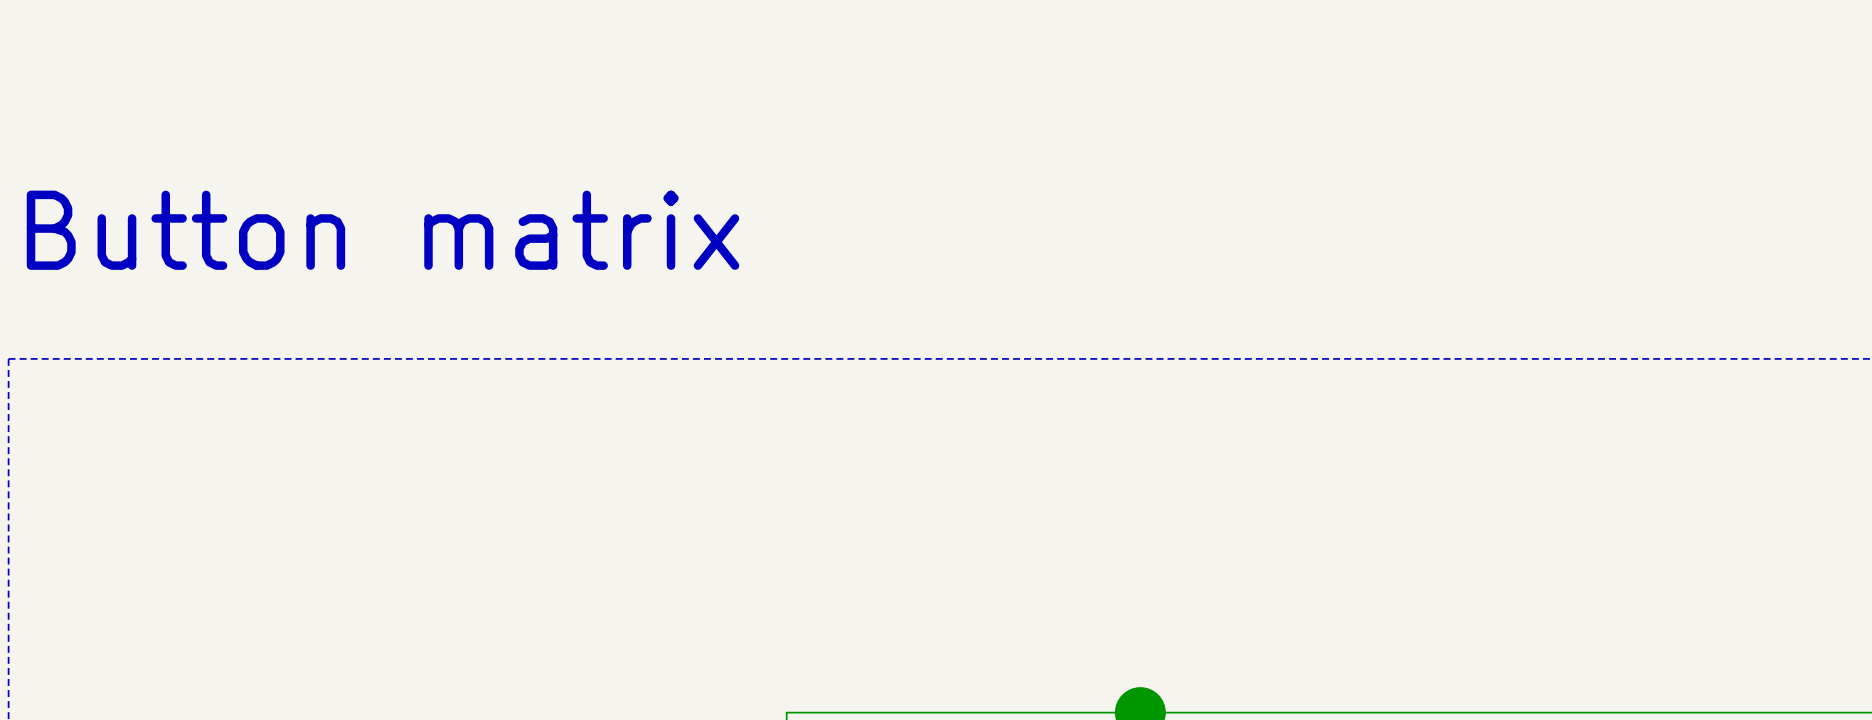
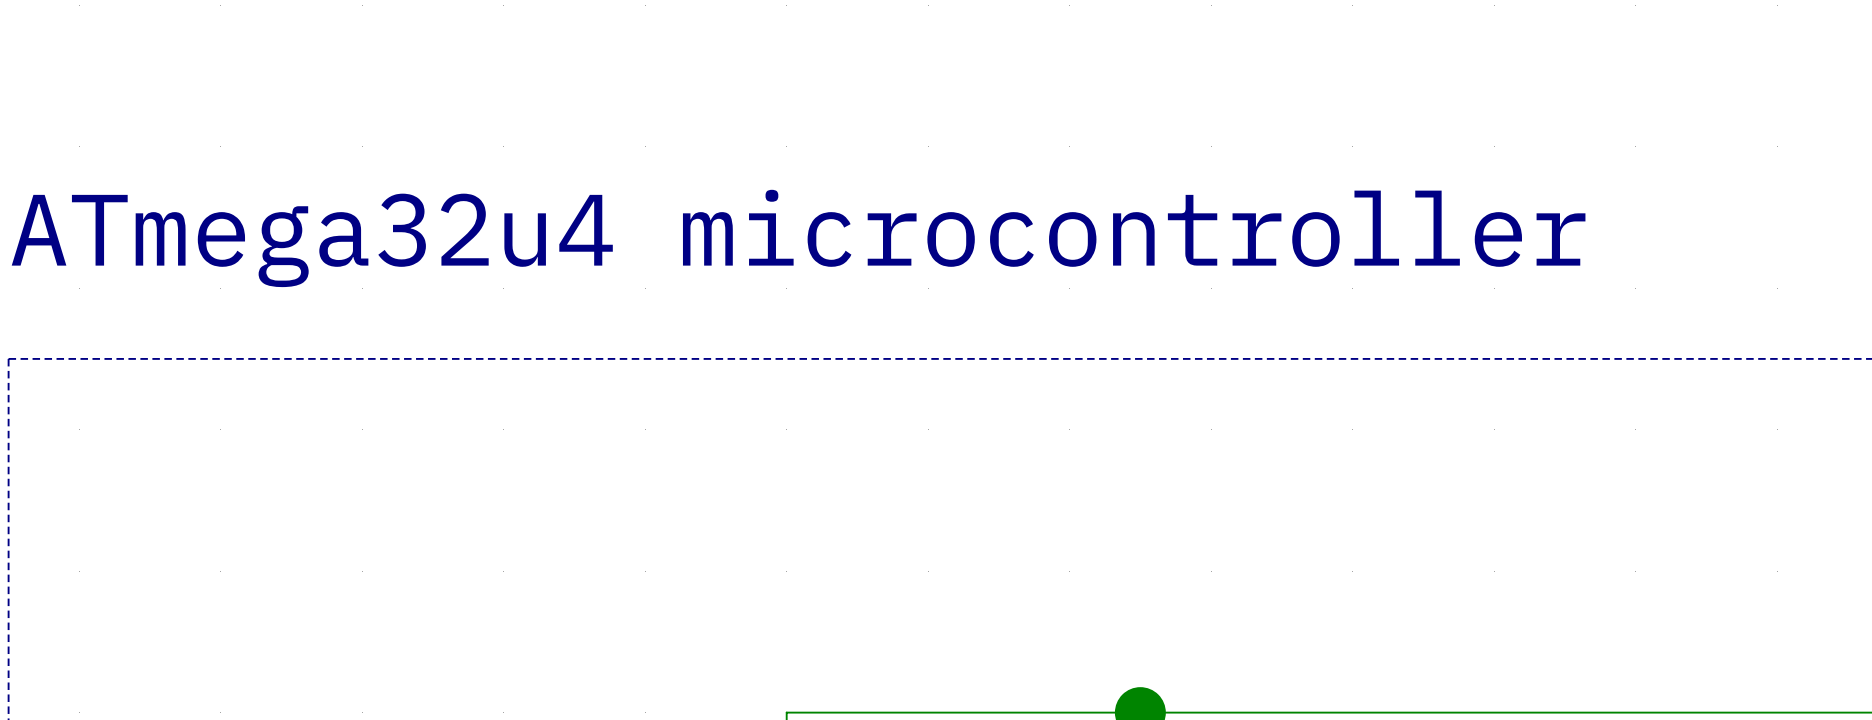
text: Button matrix (383, 230) -> ATmega32u4 microcontroller (798, 238)

